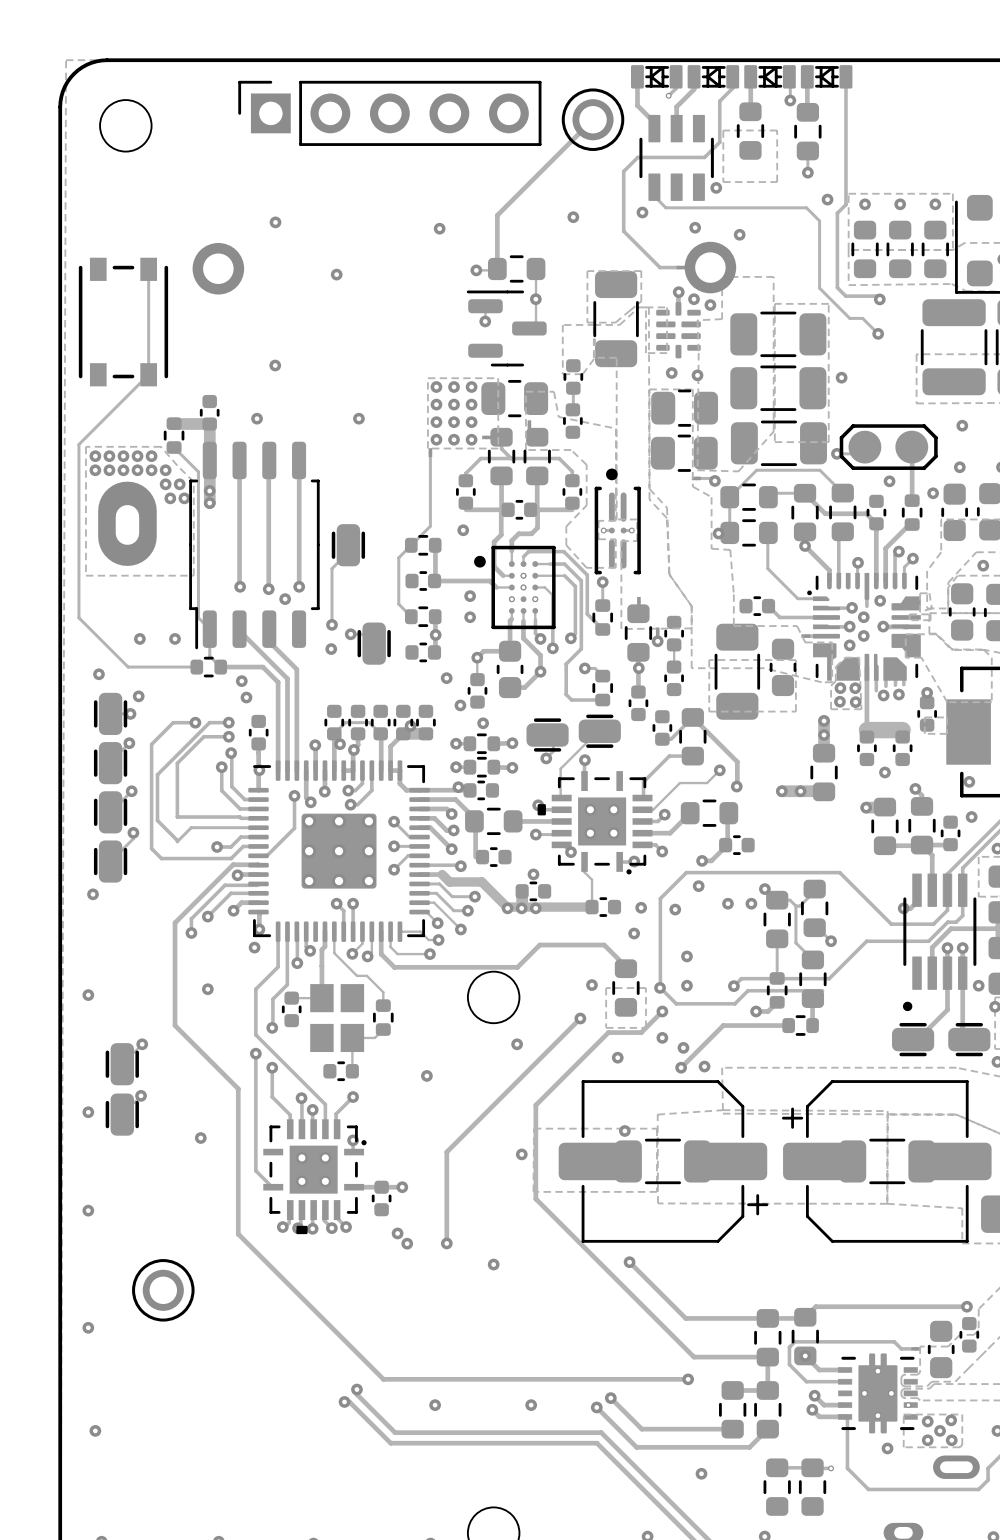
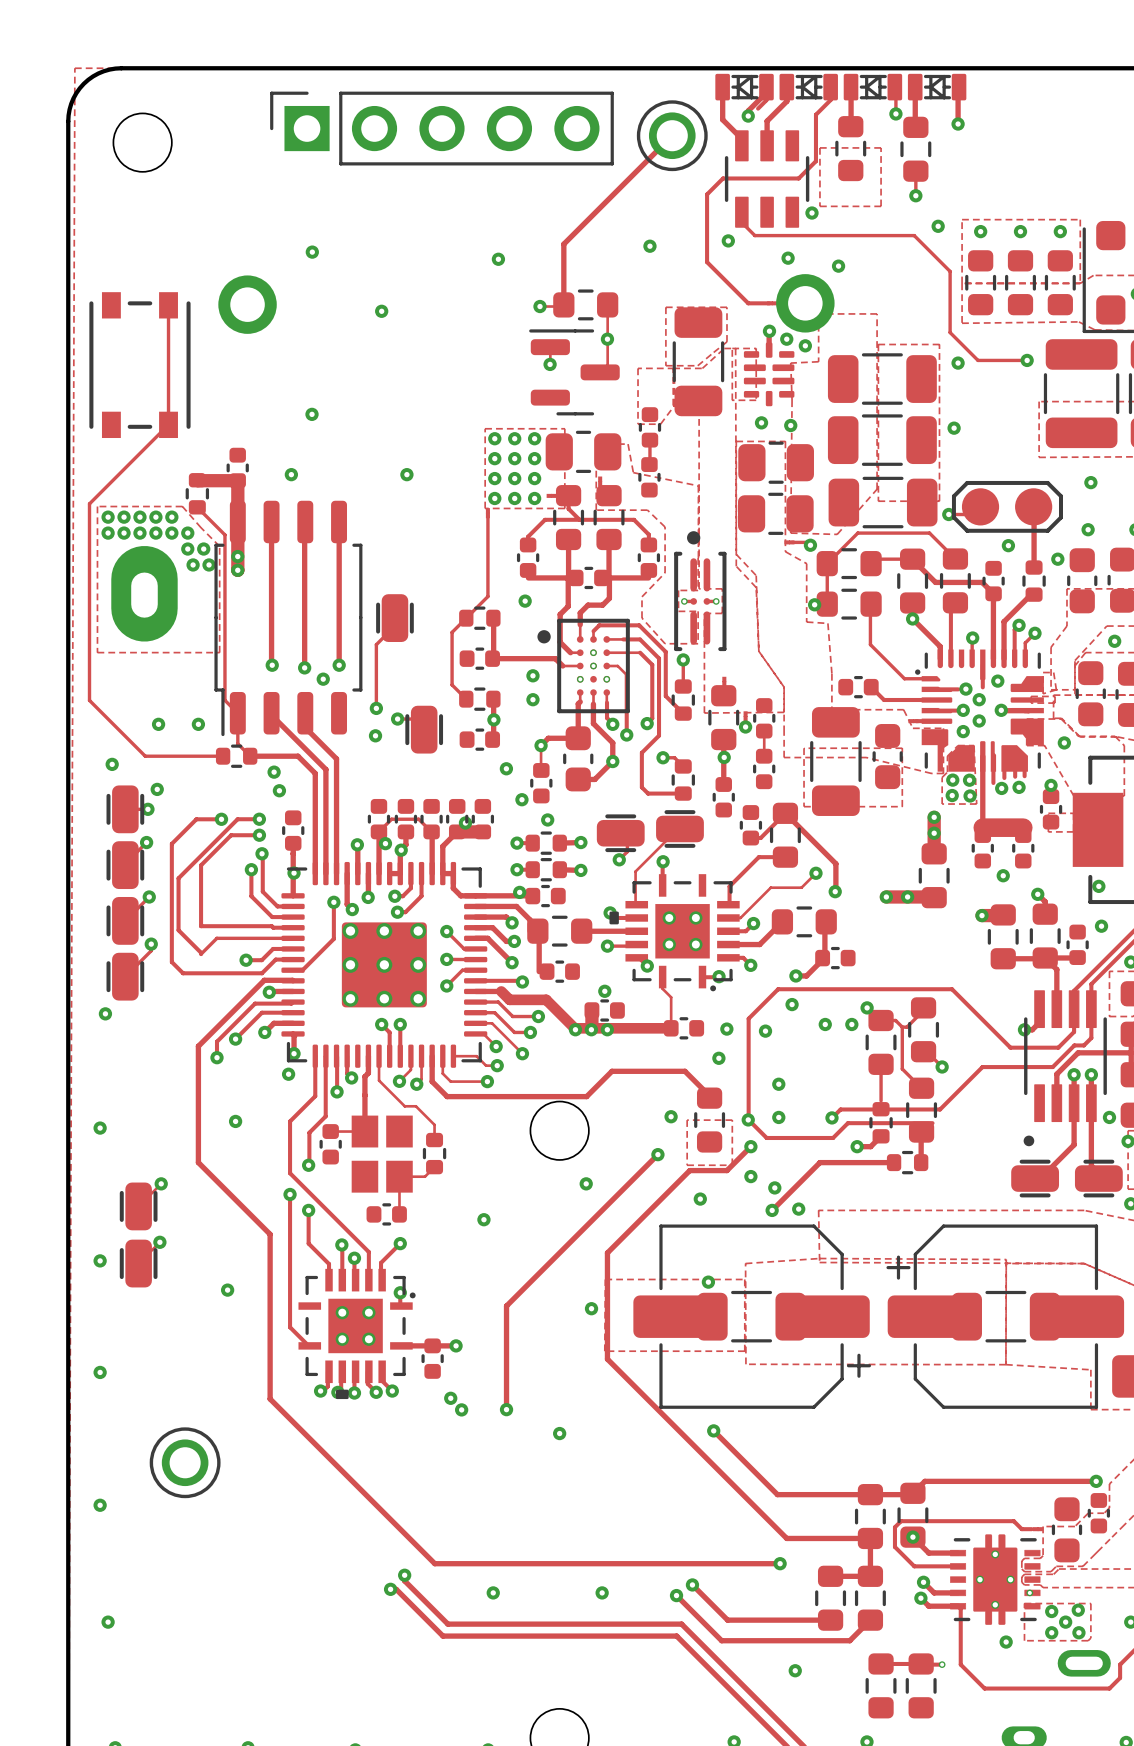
track: (845, 76) (845, 204) (837, 213) (837, 287) (845, 296) (876, 296) (879, 299) -> (959, 87) (958, 124)
track: none -> (766, 92) (748, 110) (748, 116)
via size: [665, 92, 672, 99] -> [741, 109, 755, 123]
via: none -> (958, 124)
track: (819, 220) (819, 288) (849, 318) (862, 318) (878, 333) -> (929, 250) (950, 271) (950, 332) (978, 360) (1027, 360)
via: (879, 299) -> none
via: none -> (1027, 360)
via: none -> (958, 363)
via: (878, 333) -> none
via: none -> (1064, 742)

